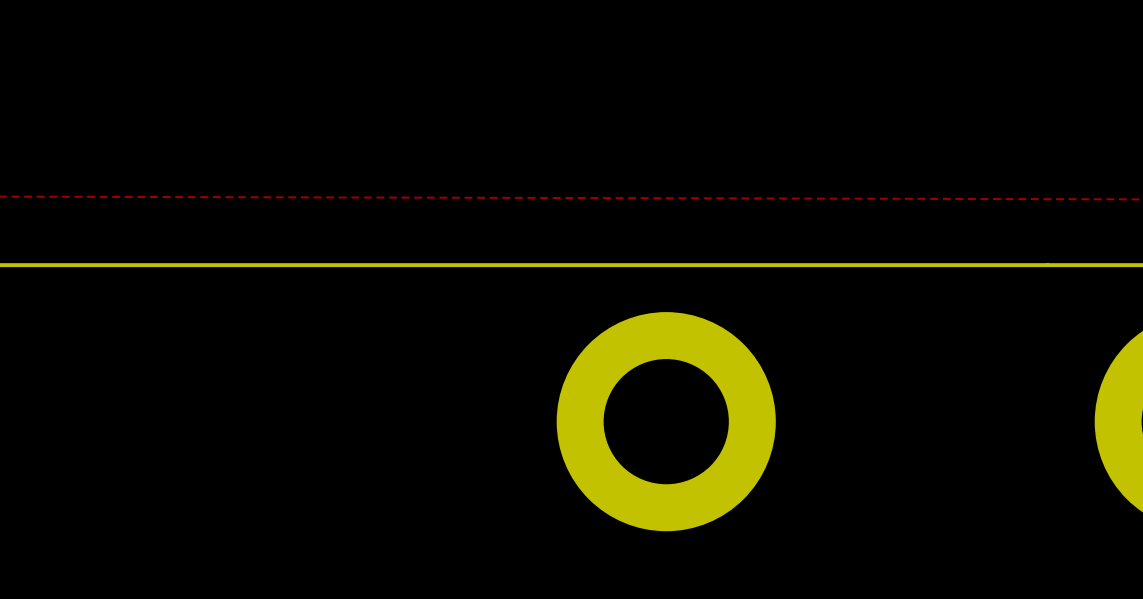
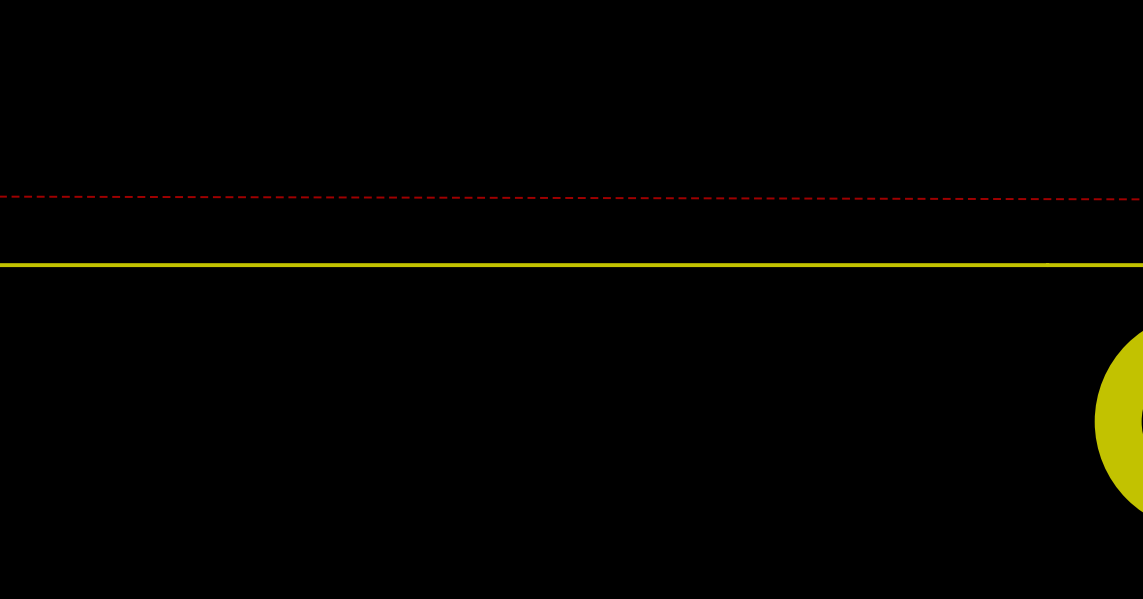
part: (666, 421) -> none

